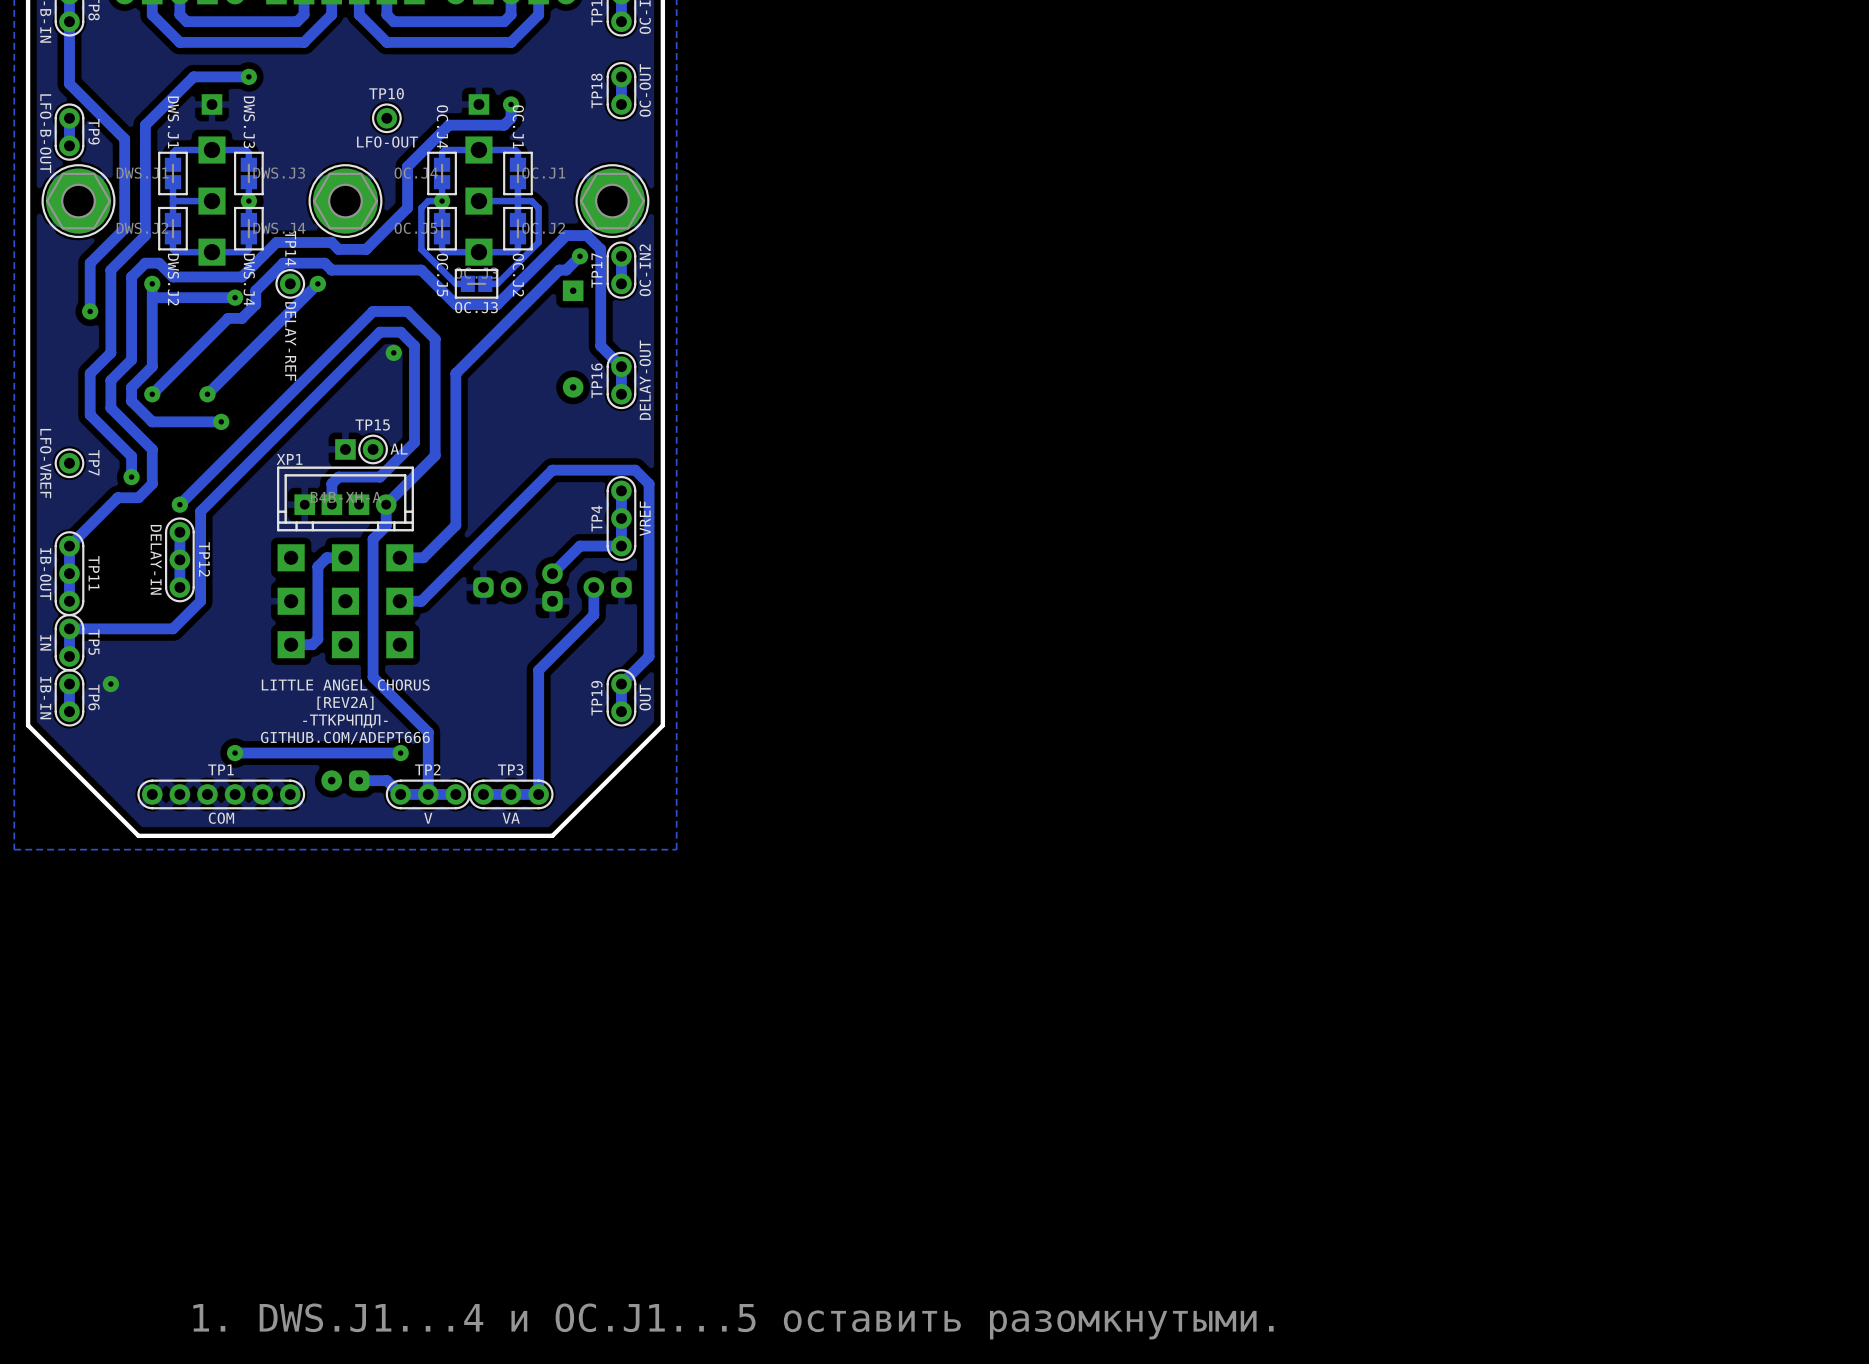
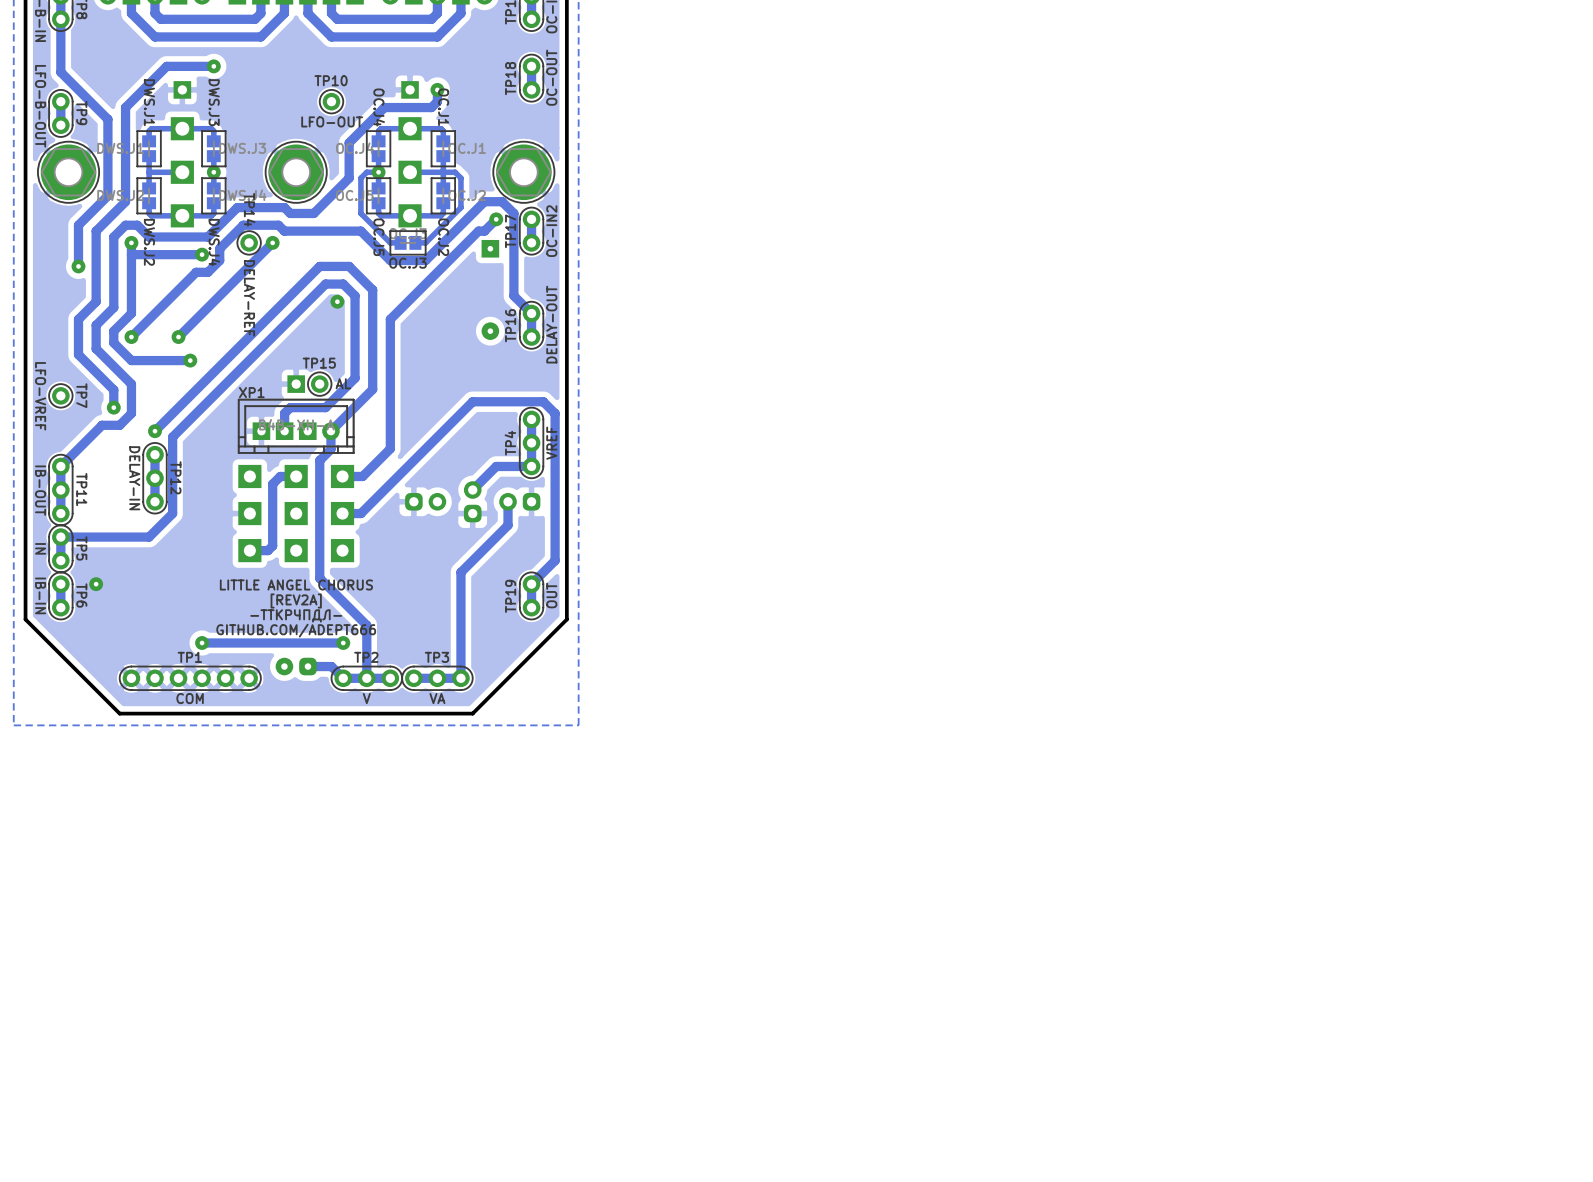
text: 1. DWS.J1...4 и OC.J1...5 оставить разомкнутыми. (733, 1321) -> none

